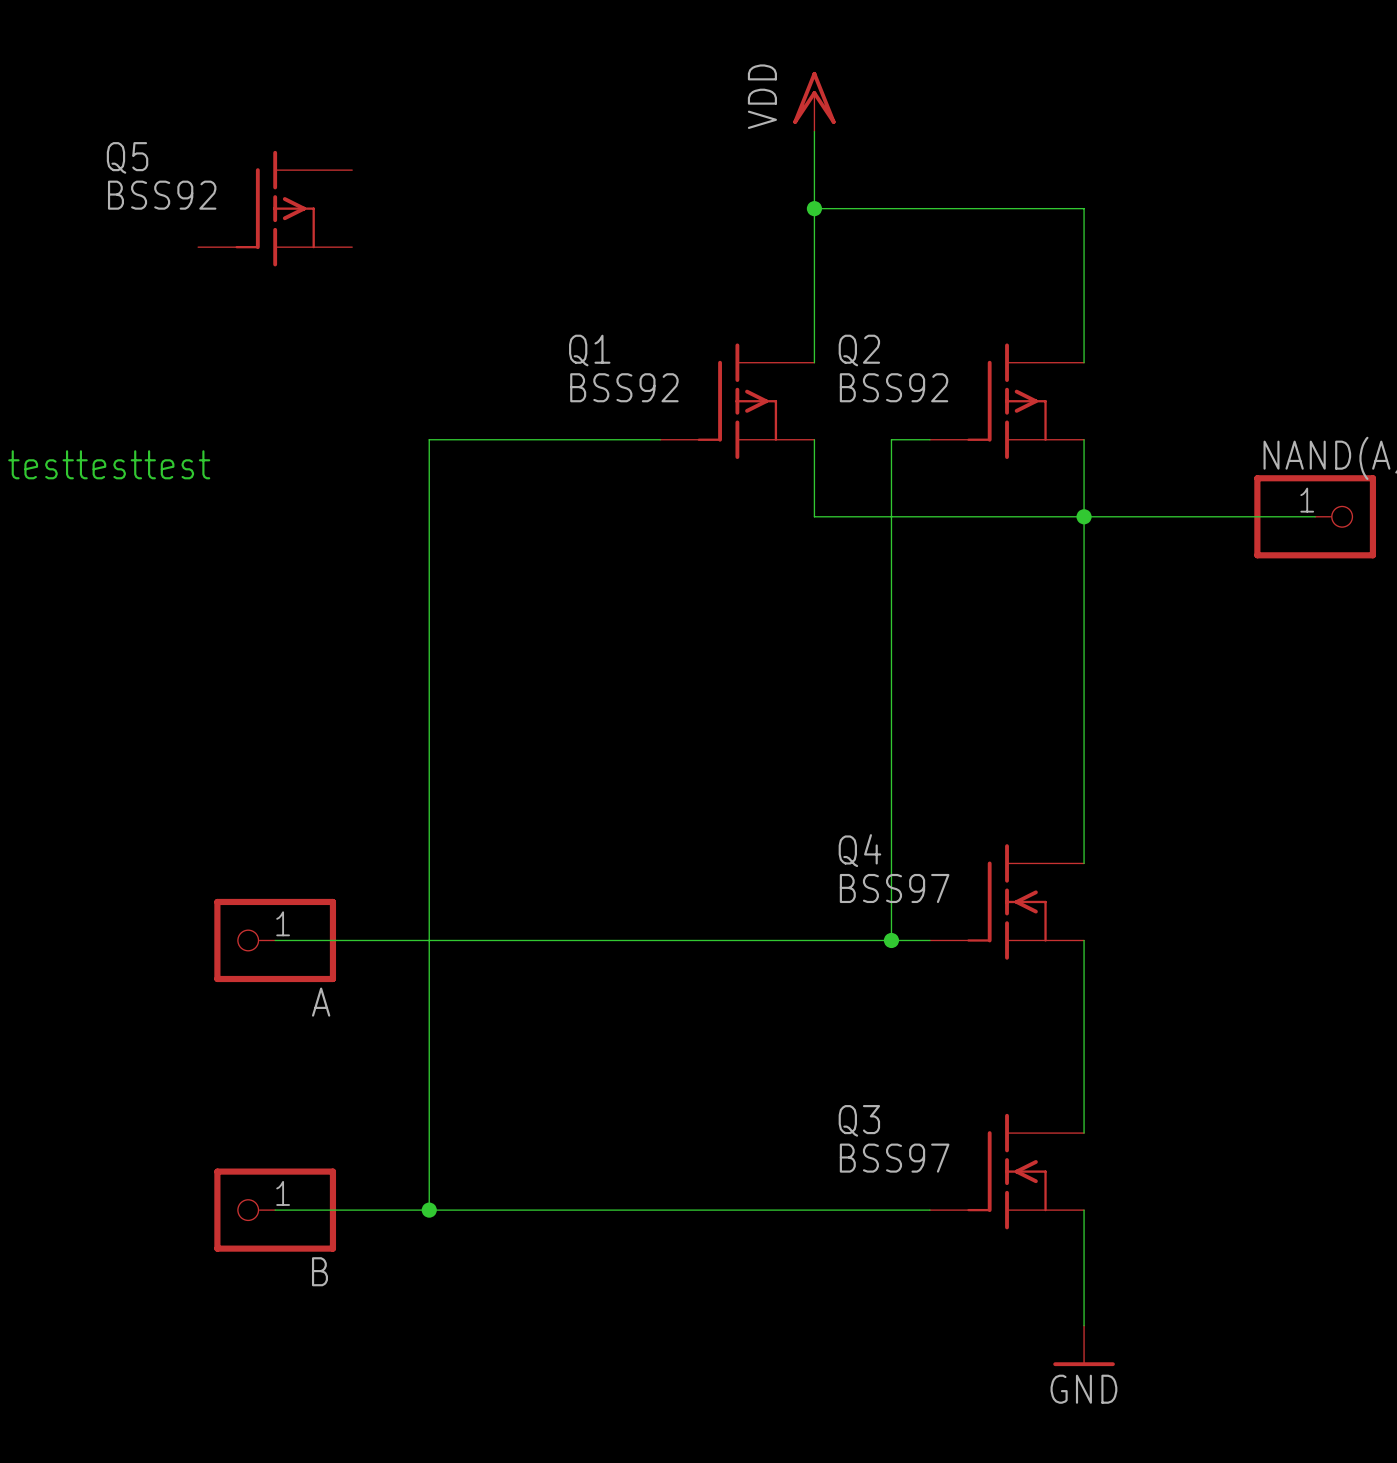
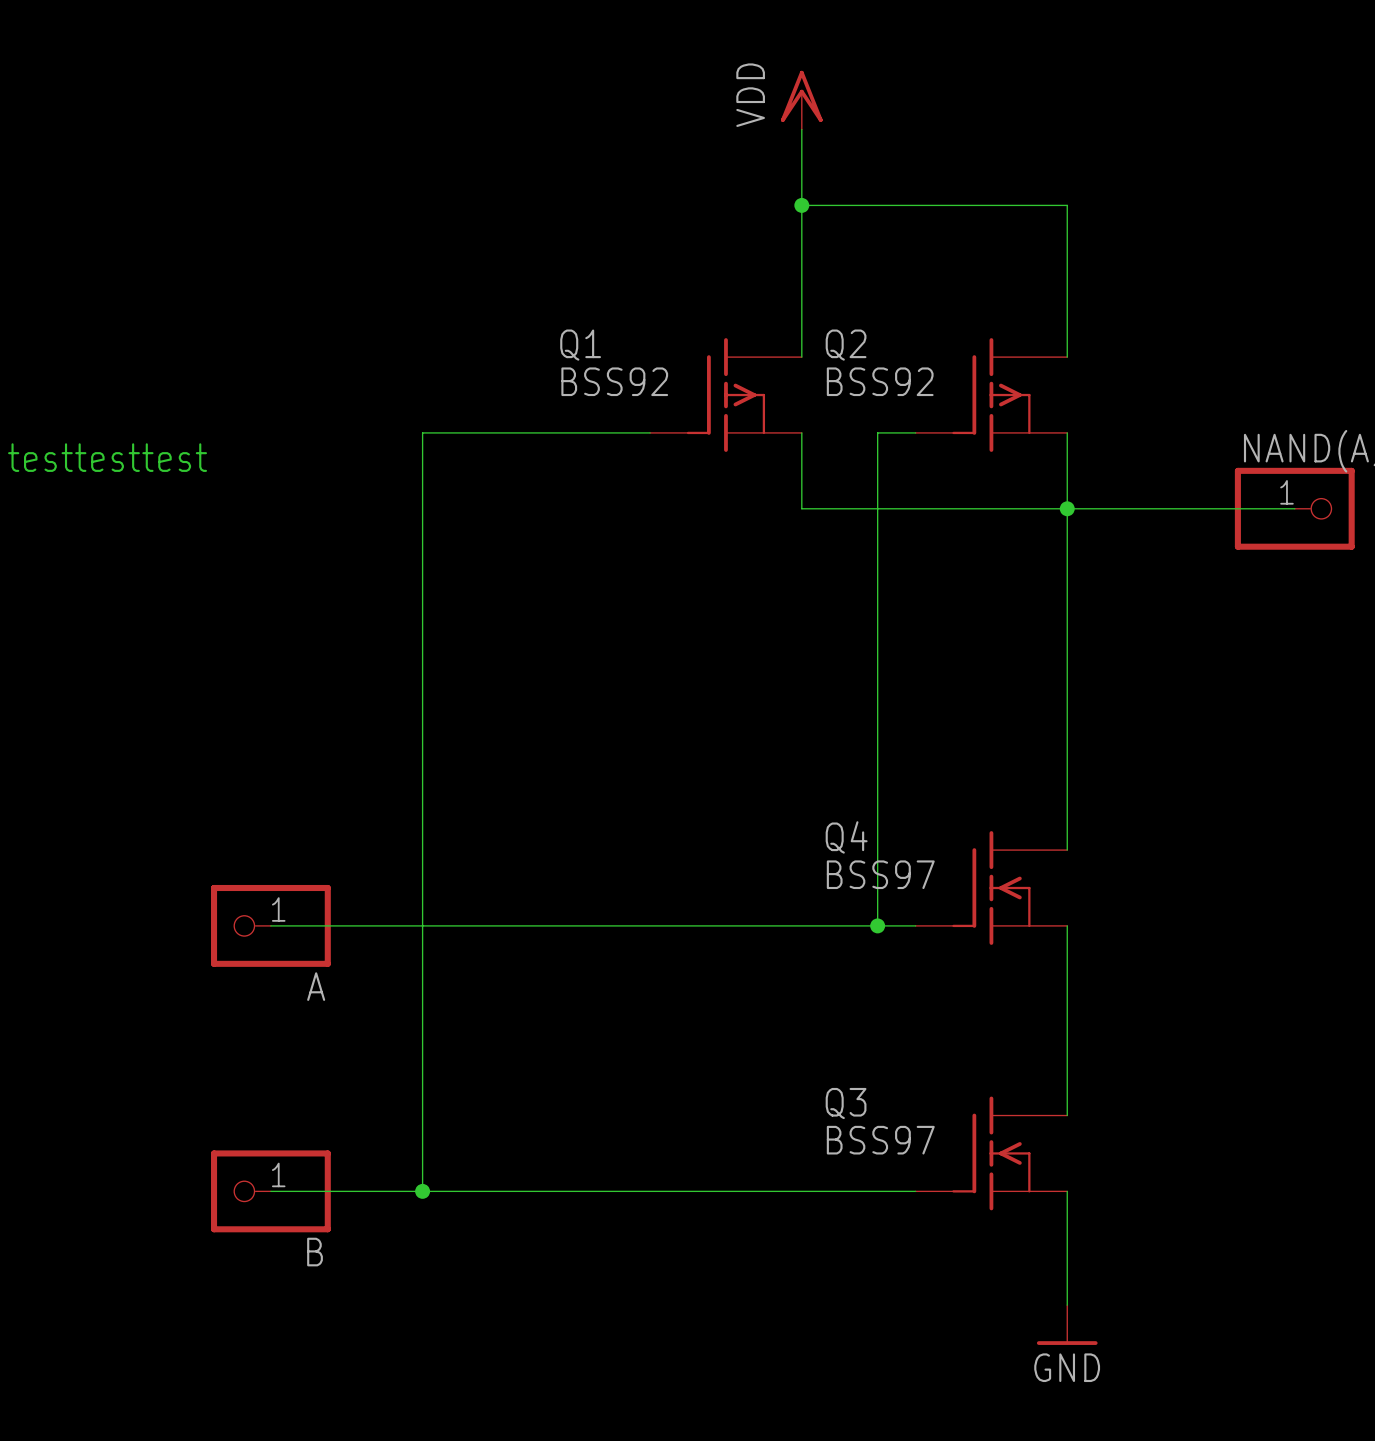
Q5: BSS92 (275, 208) -> none

